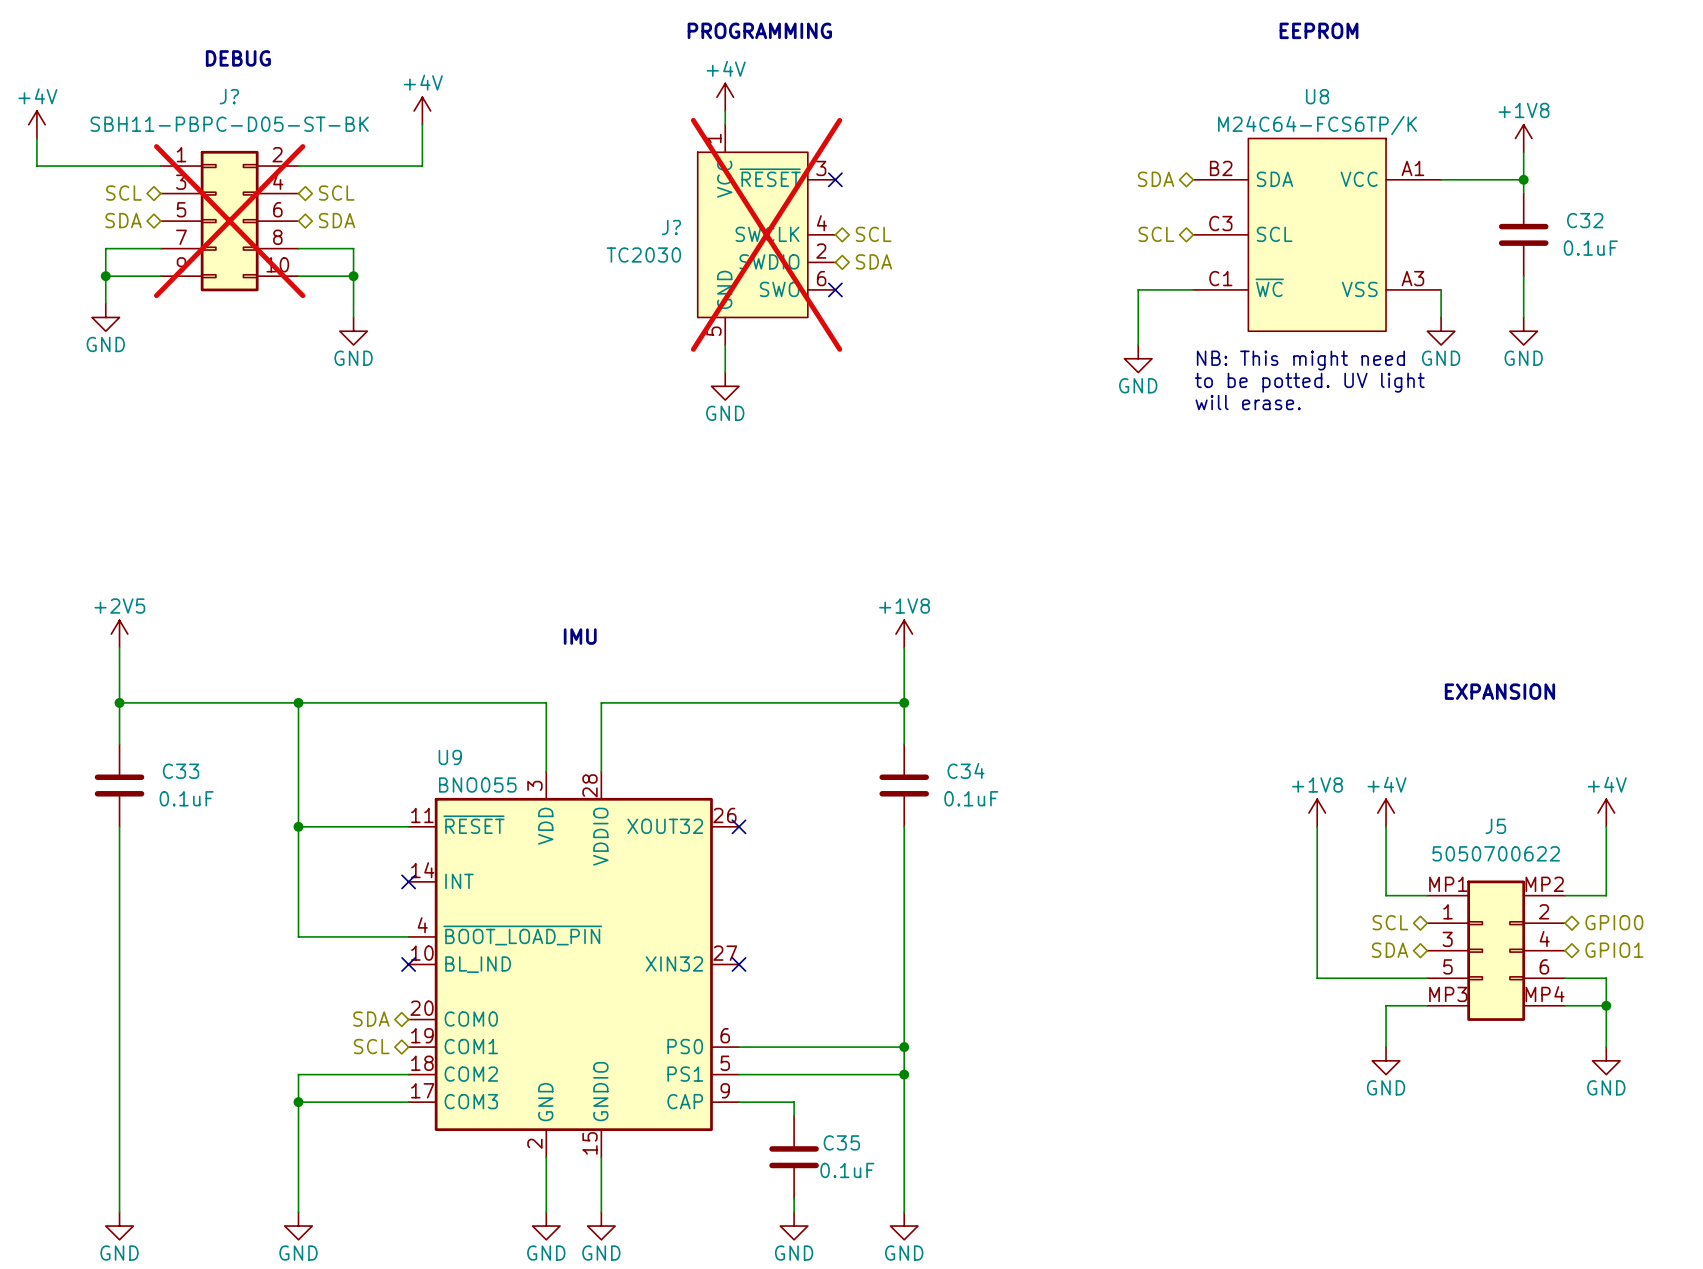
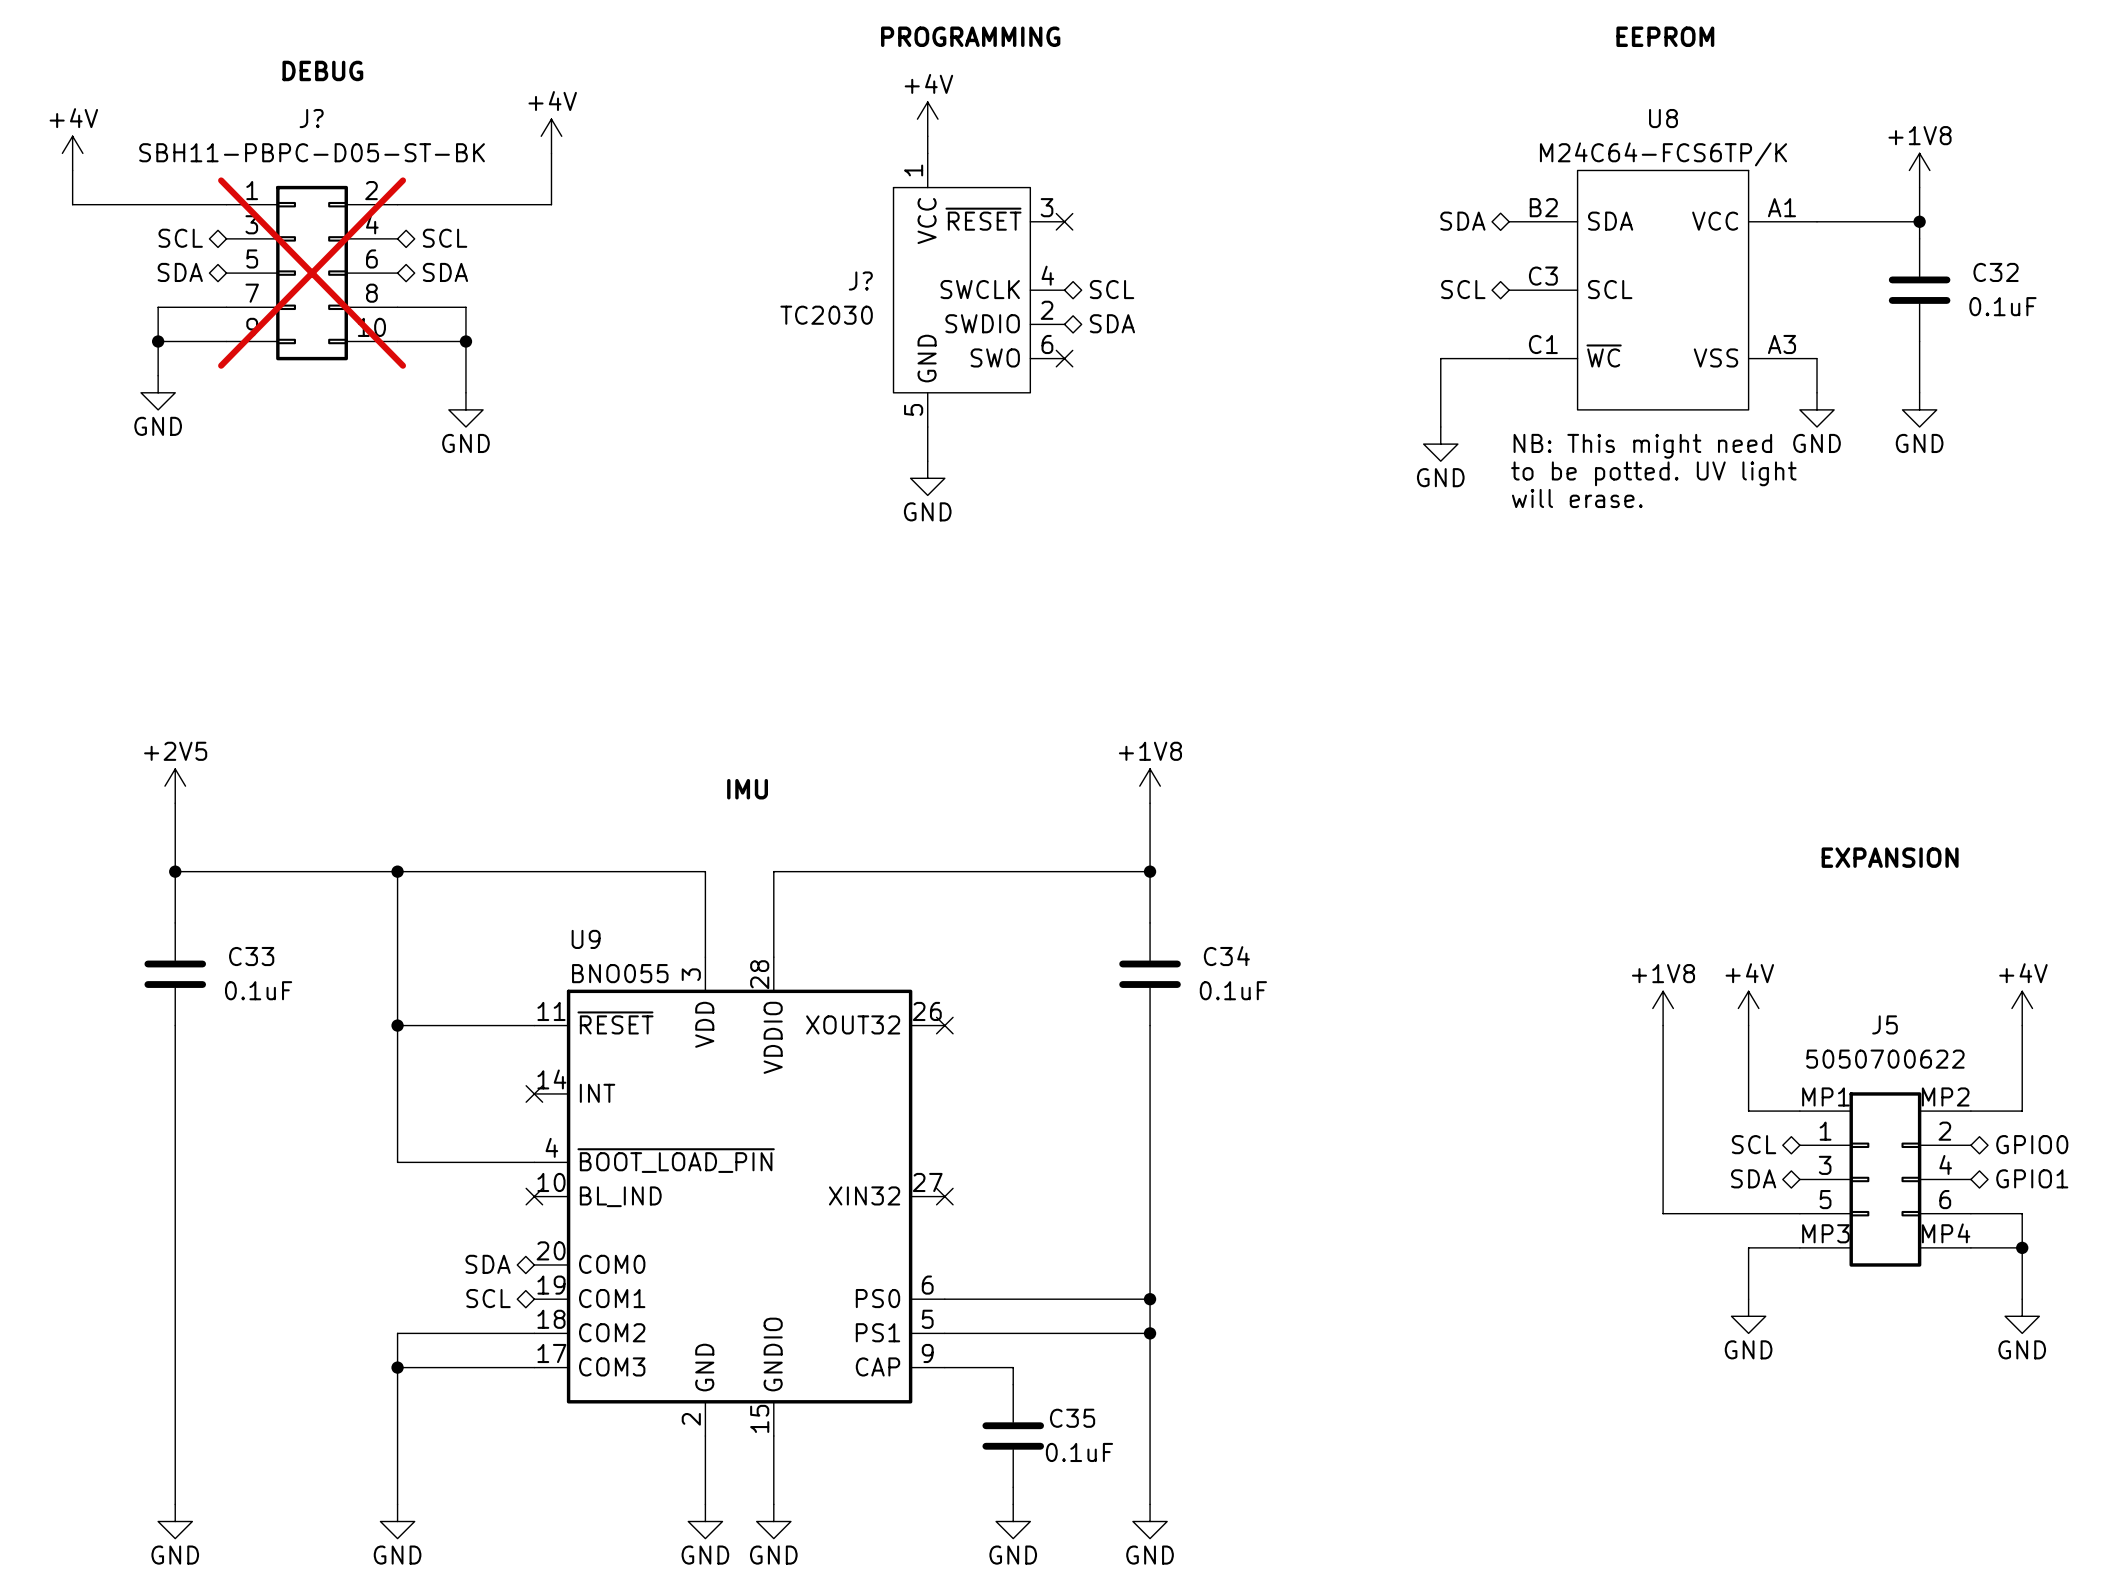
J? do-not-place cross: (766, 234) -> none

